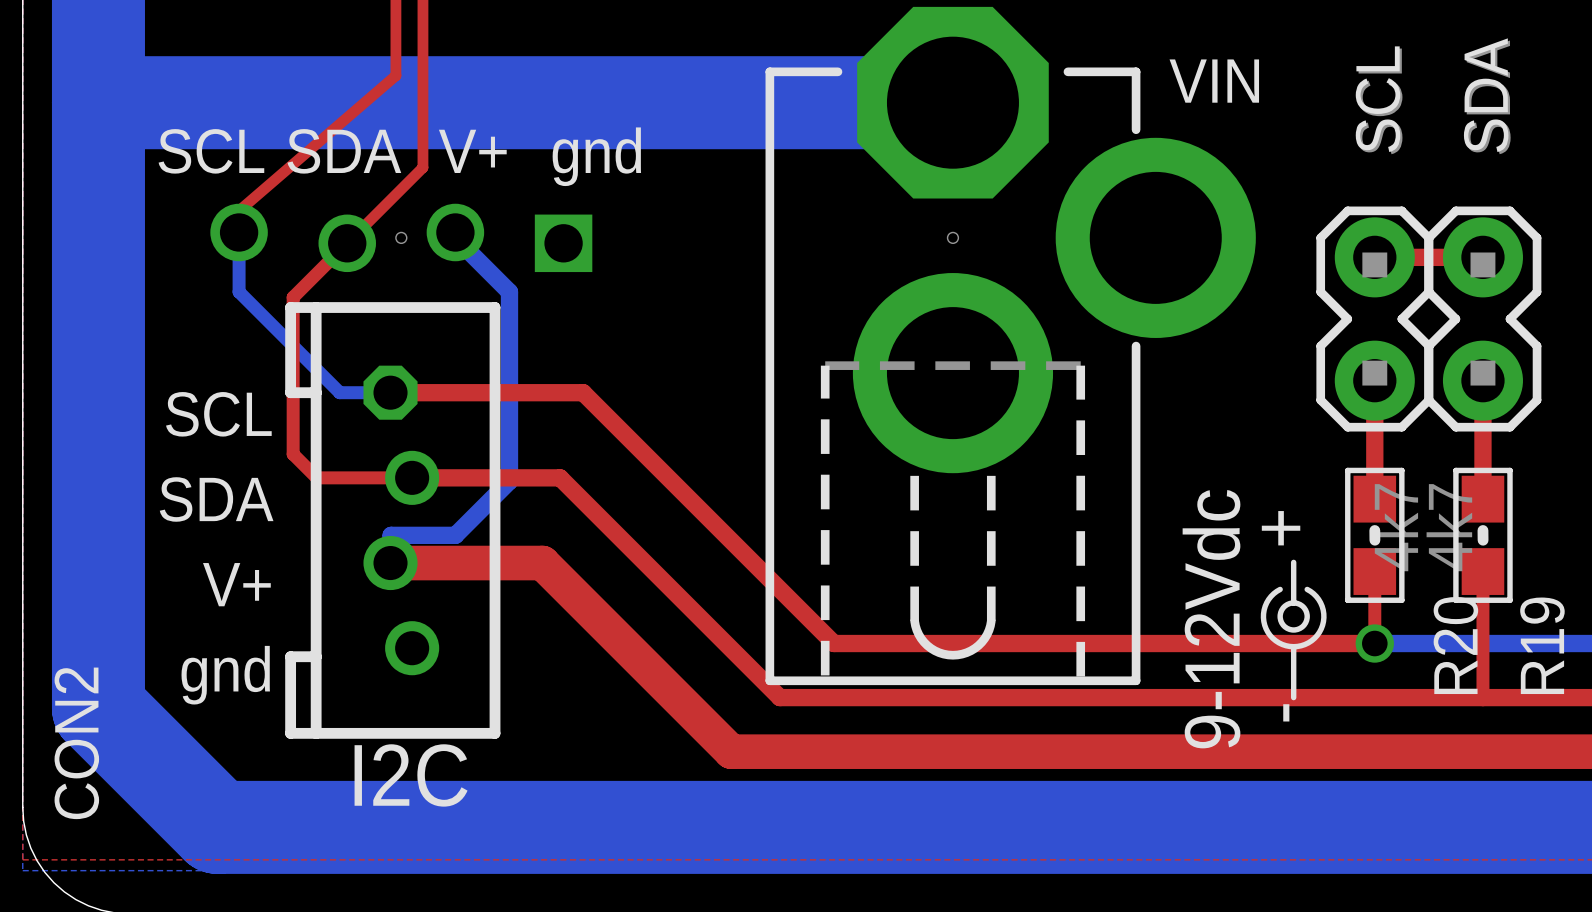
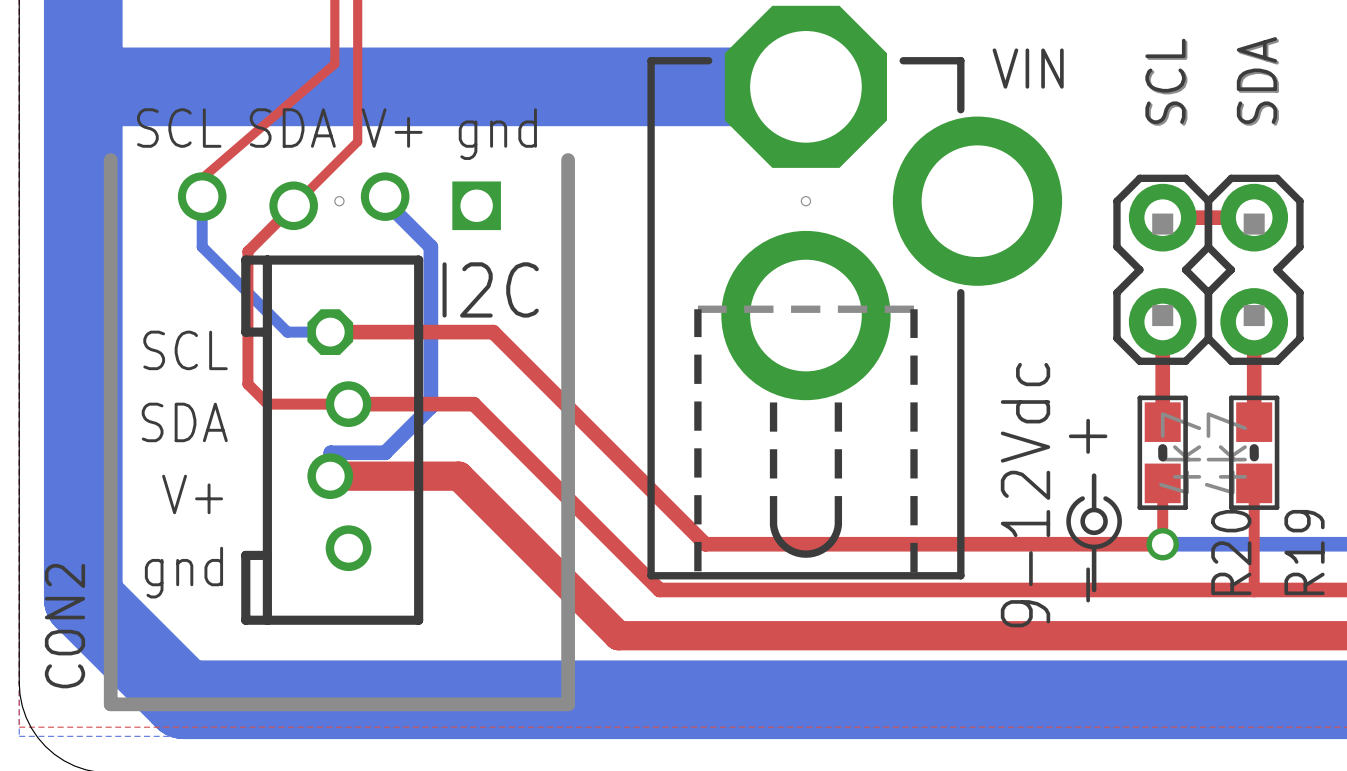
CON2 footprint: [210, 203, 593, 739] -> [103, 153, 575, 712]

